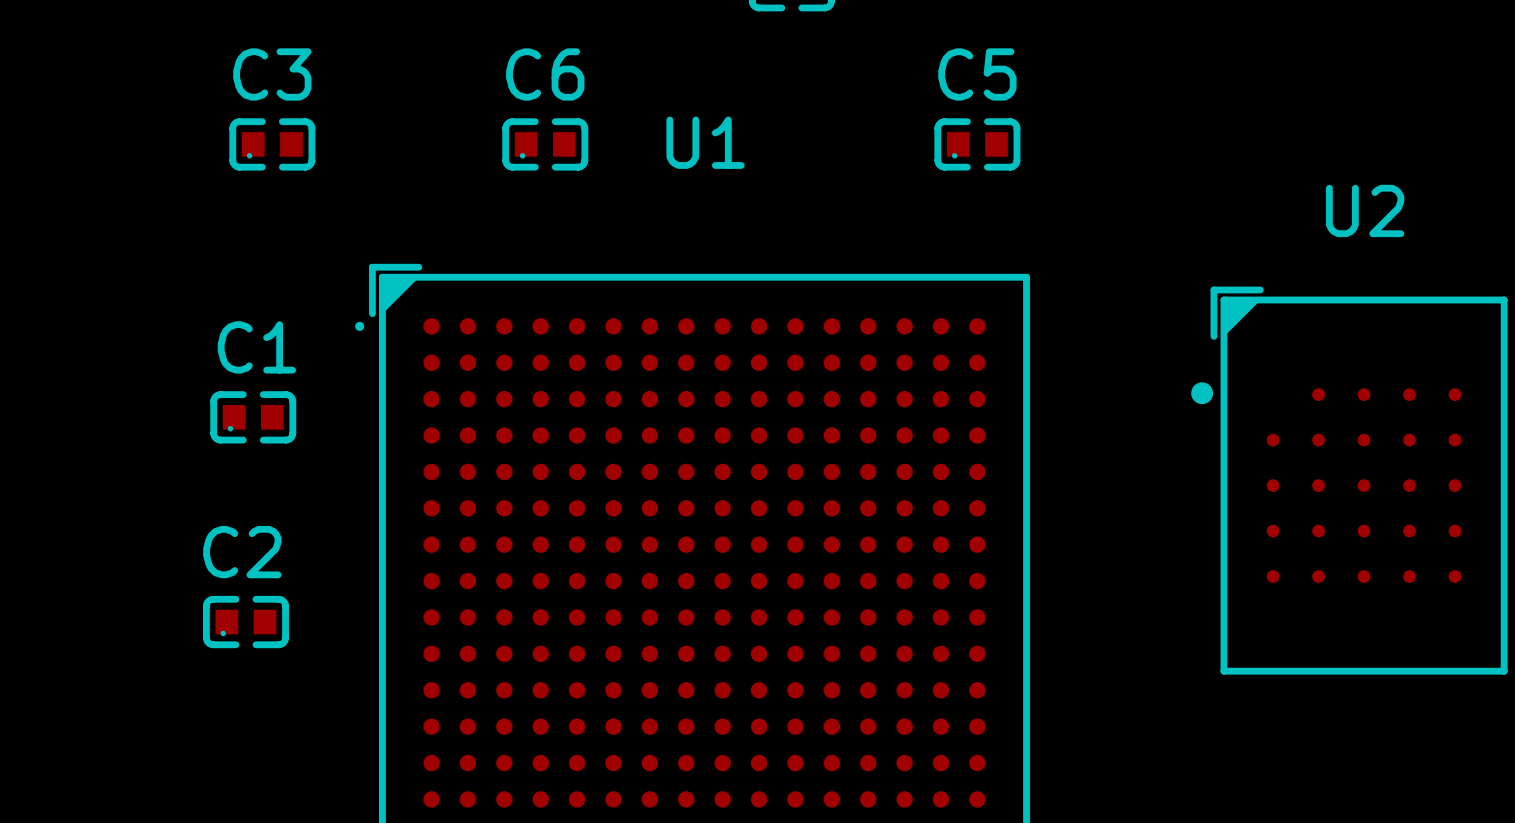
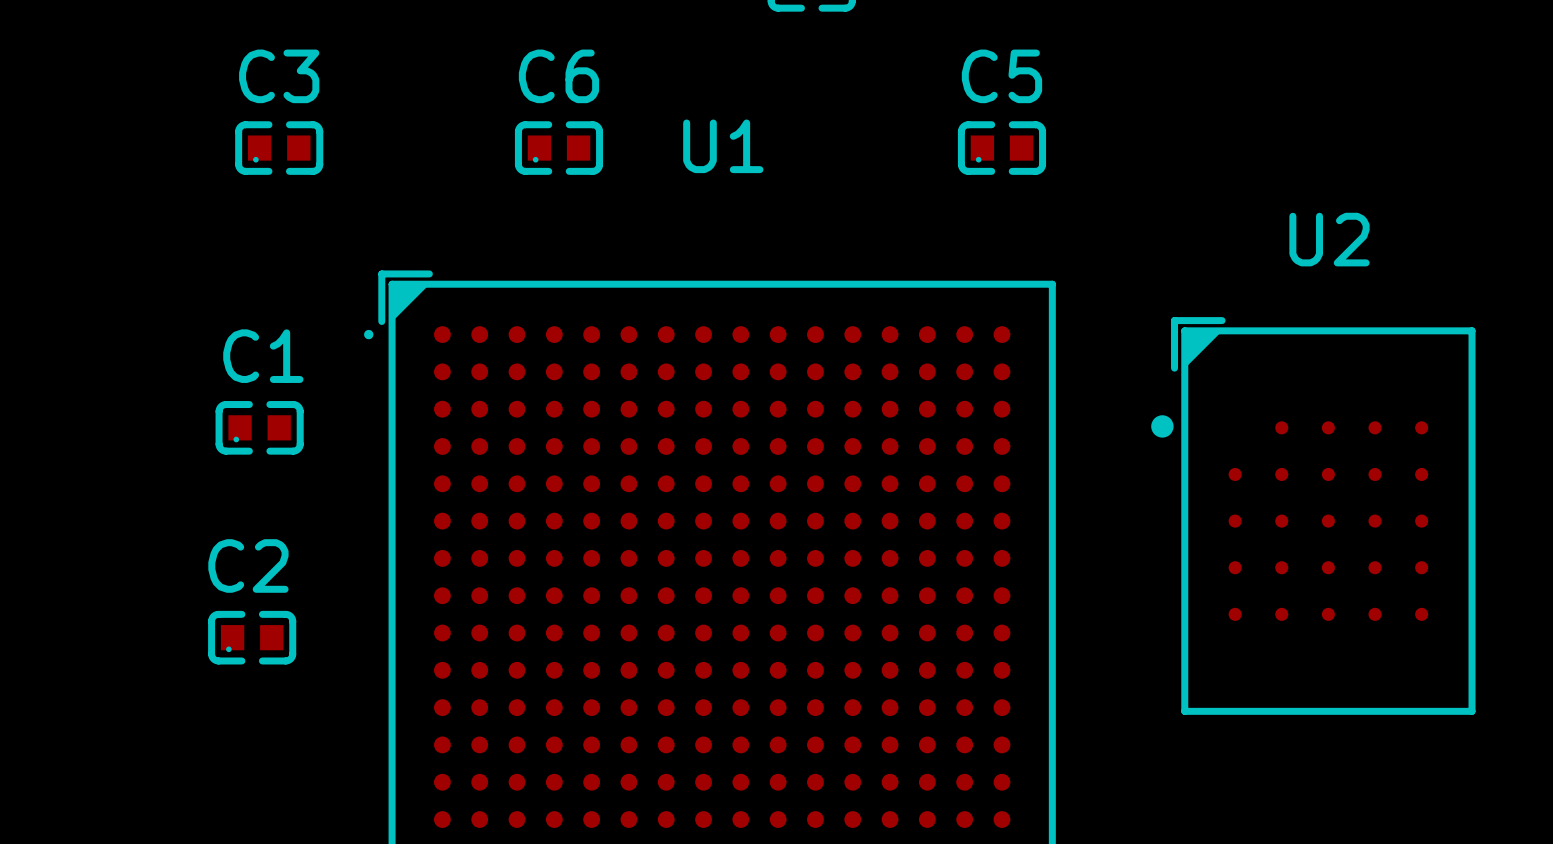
U2 position: (1349, 480) -> (1313, 515)

